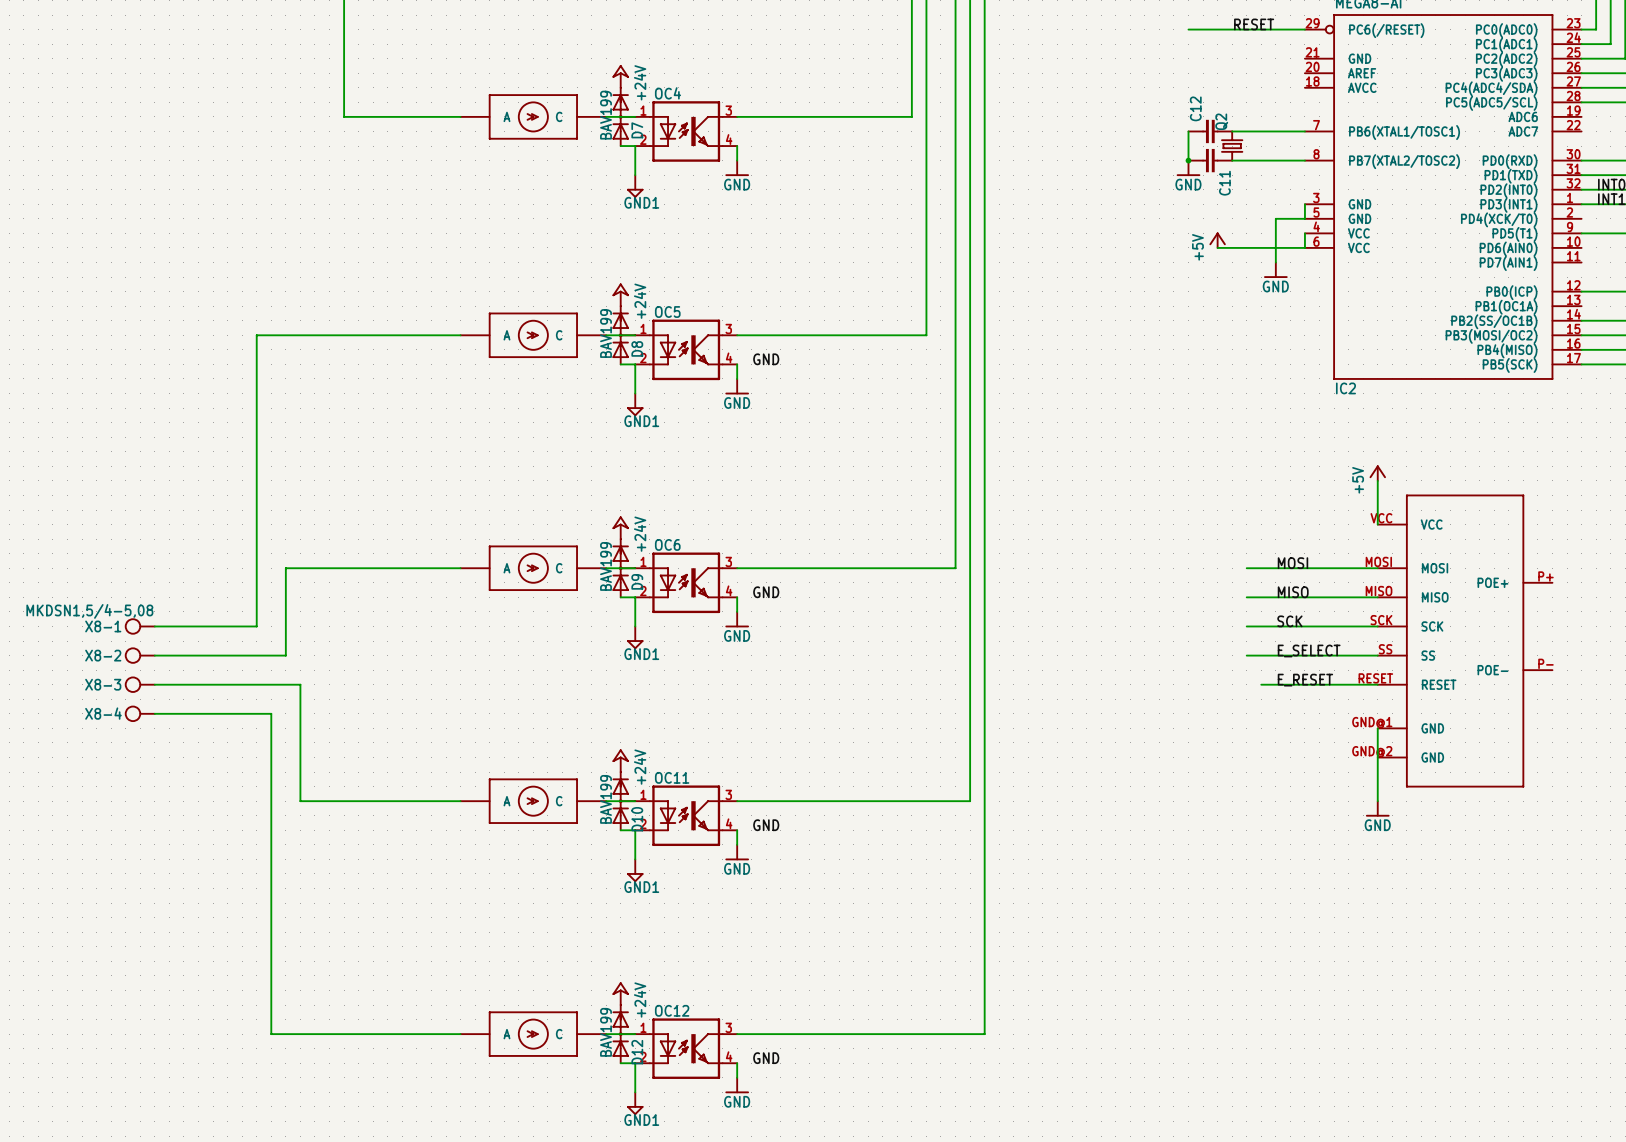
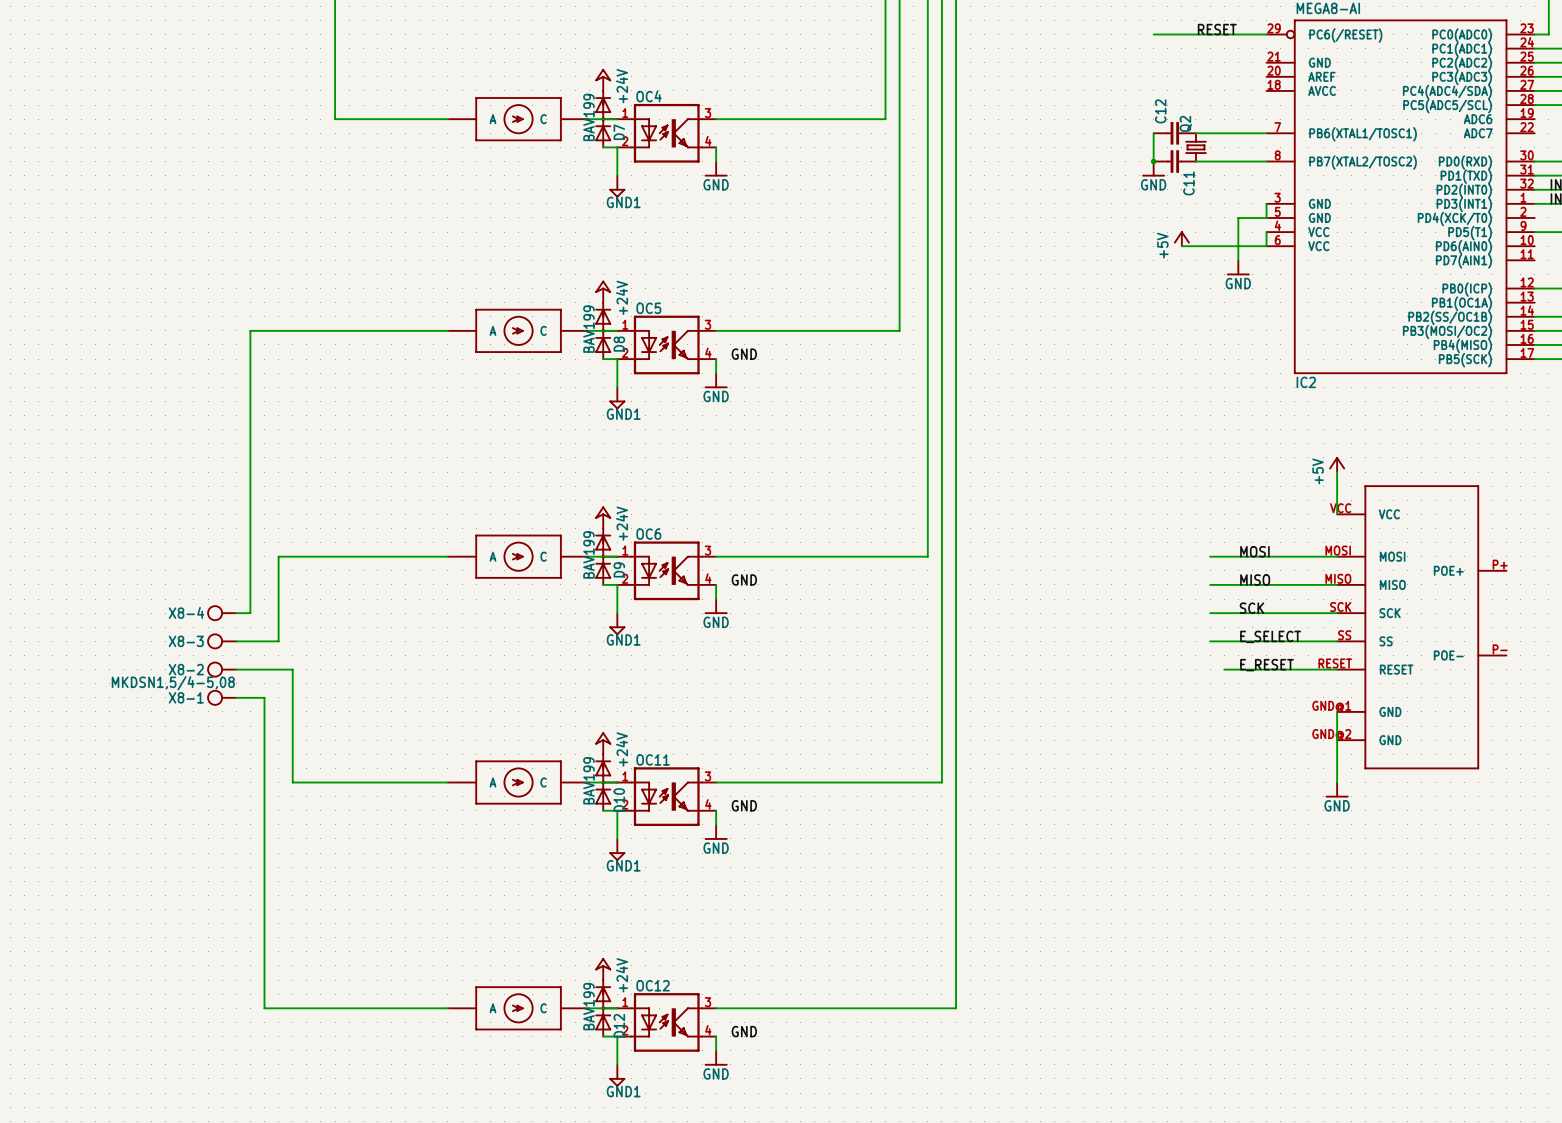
X8-1 position: (139, 626) -> (221, 697)
wire: (154, 626) (242, 626) -> none
X8-2 position: (139, 655) -> (221, 669)
wire: (154, 655) (242, 655) -> none
X8-3 position: (139, 684) -> (221, 641)
wire: (154, 684) (242, 684) -> none
X8-4 position: (139, 713) -> (221, 613)
wire: (154, 713) (242, 713) -> none

